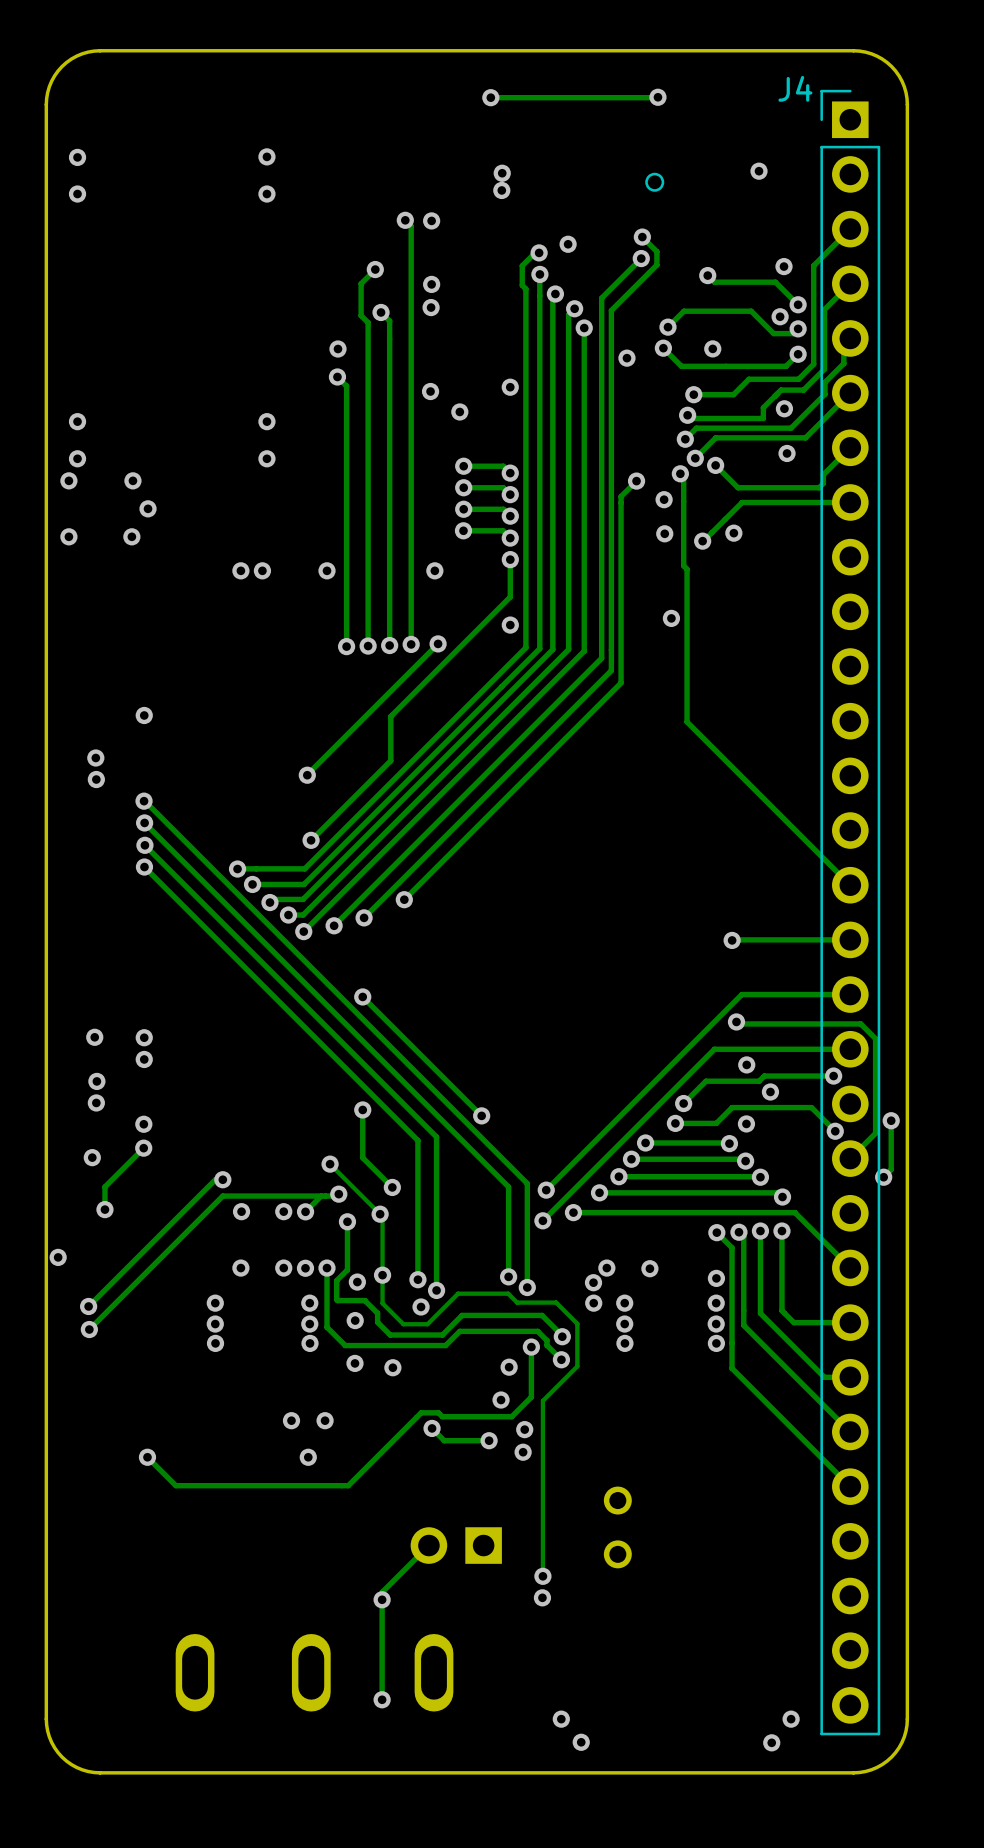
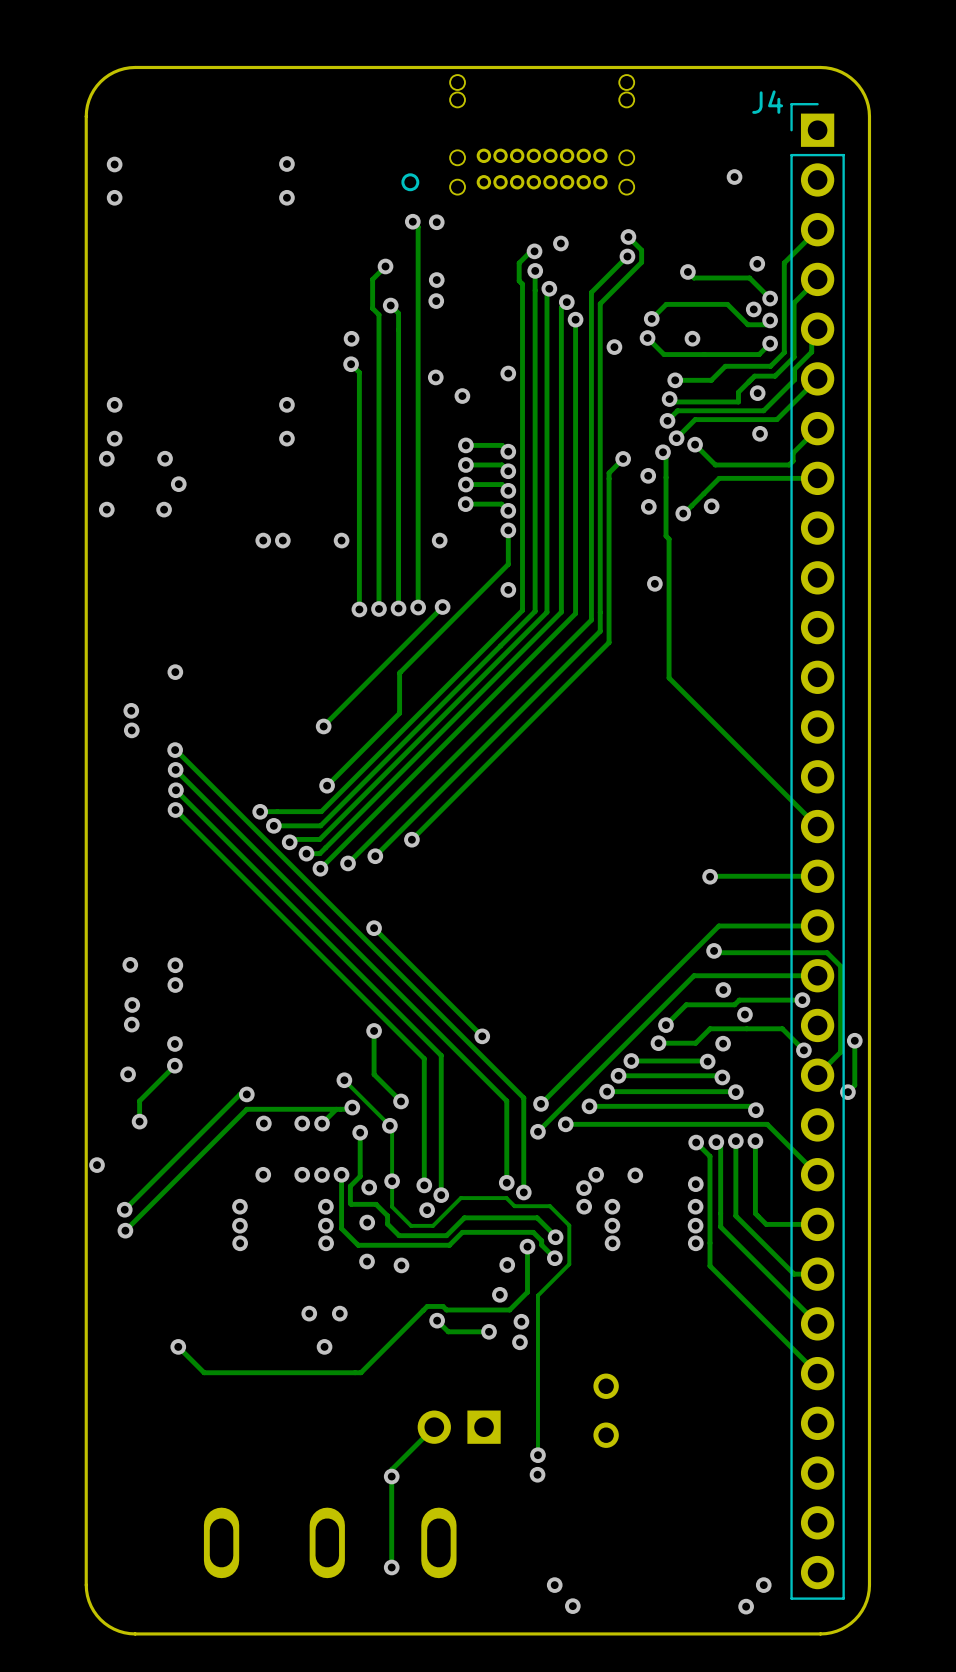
via: (490, 97) -> none
track: (657, 97) (490, 97) -> none
via: (657, 97) -> none
part: none -> (517, 134)
via: (502, 173) -> none
part: (654, 182) -> none
via: (501, 190) -> none

